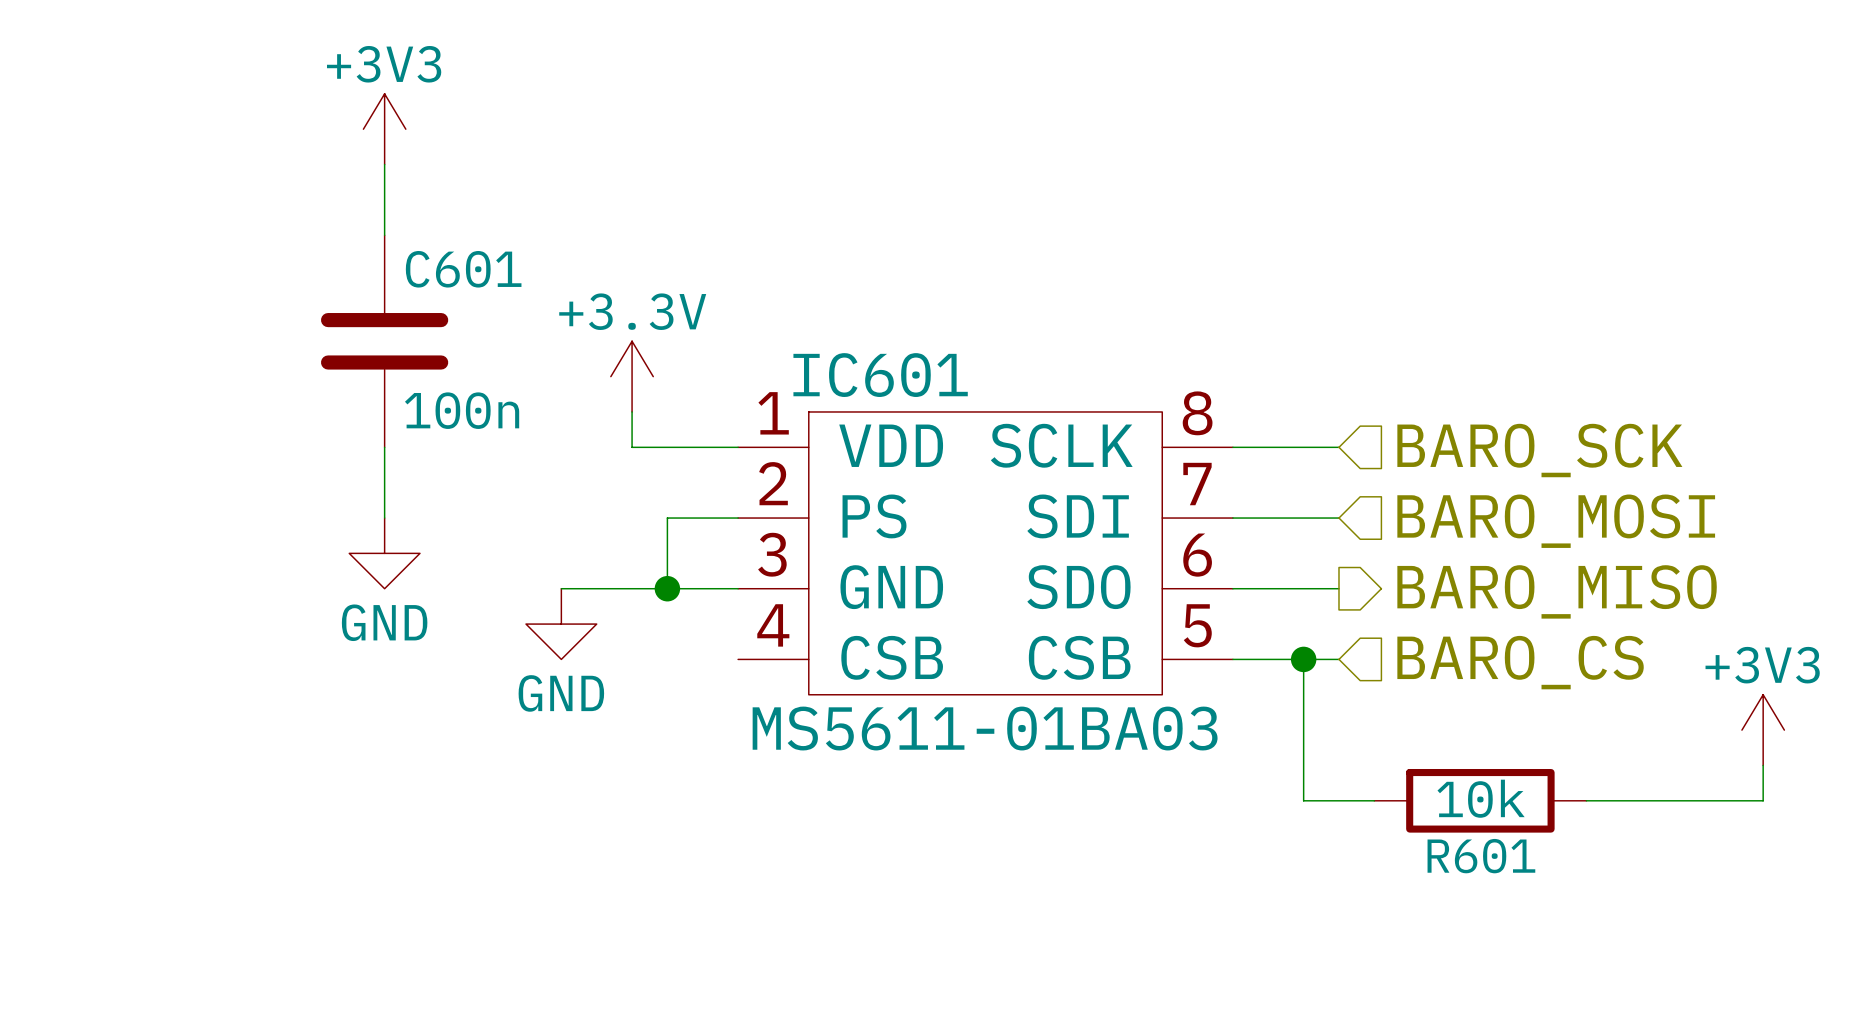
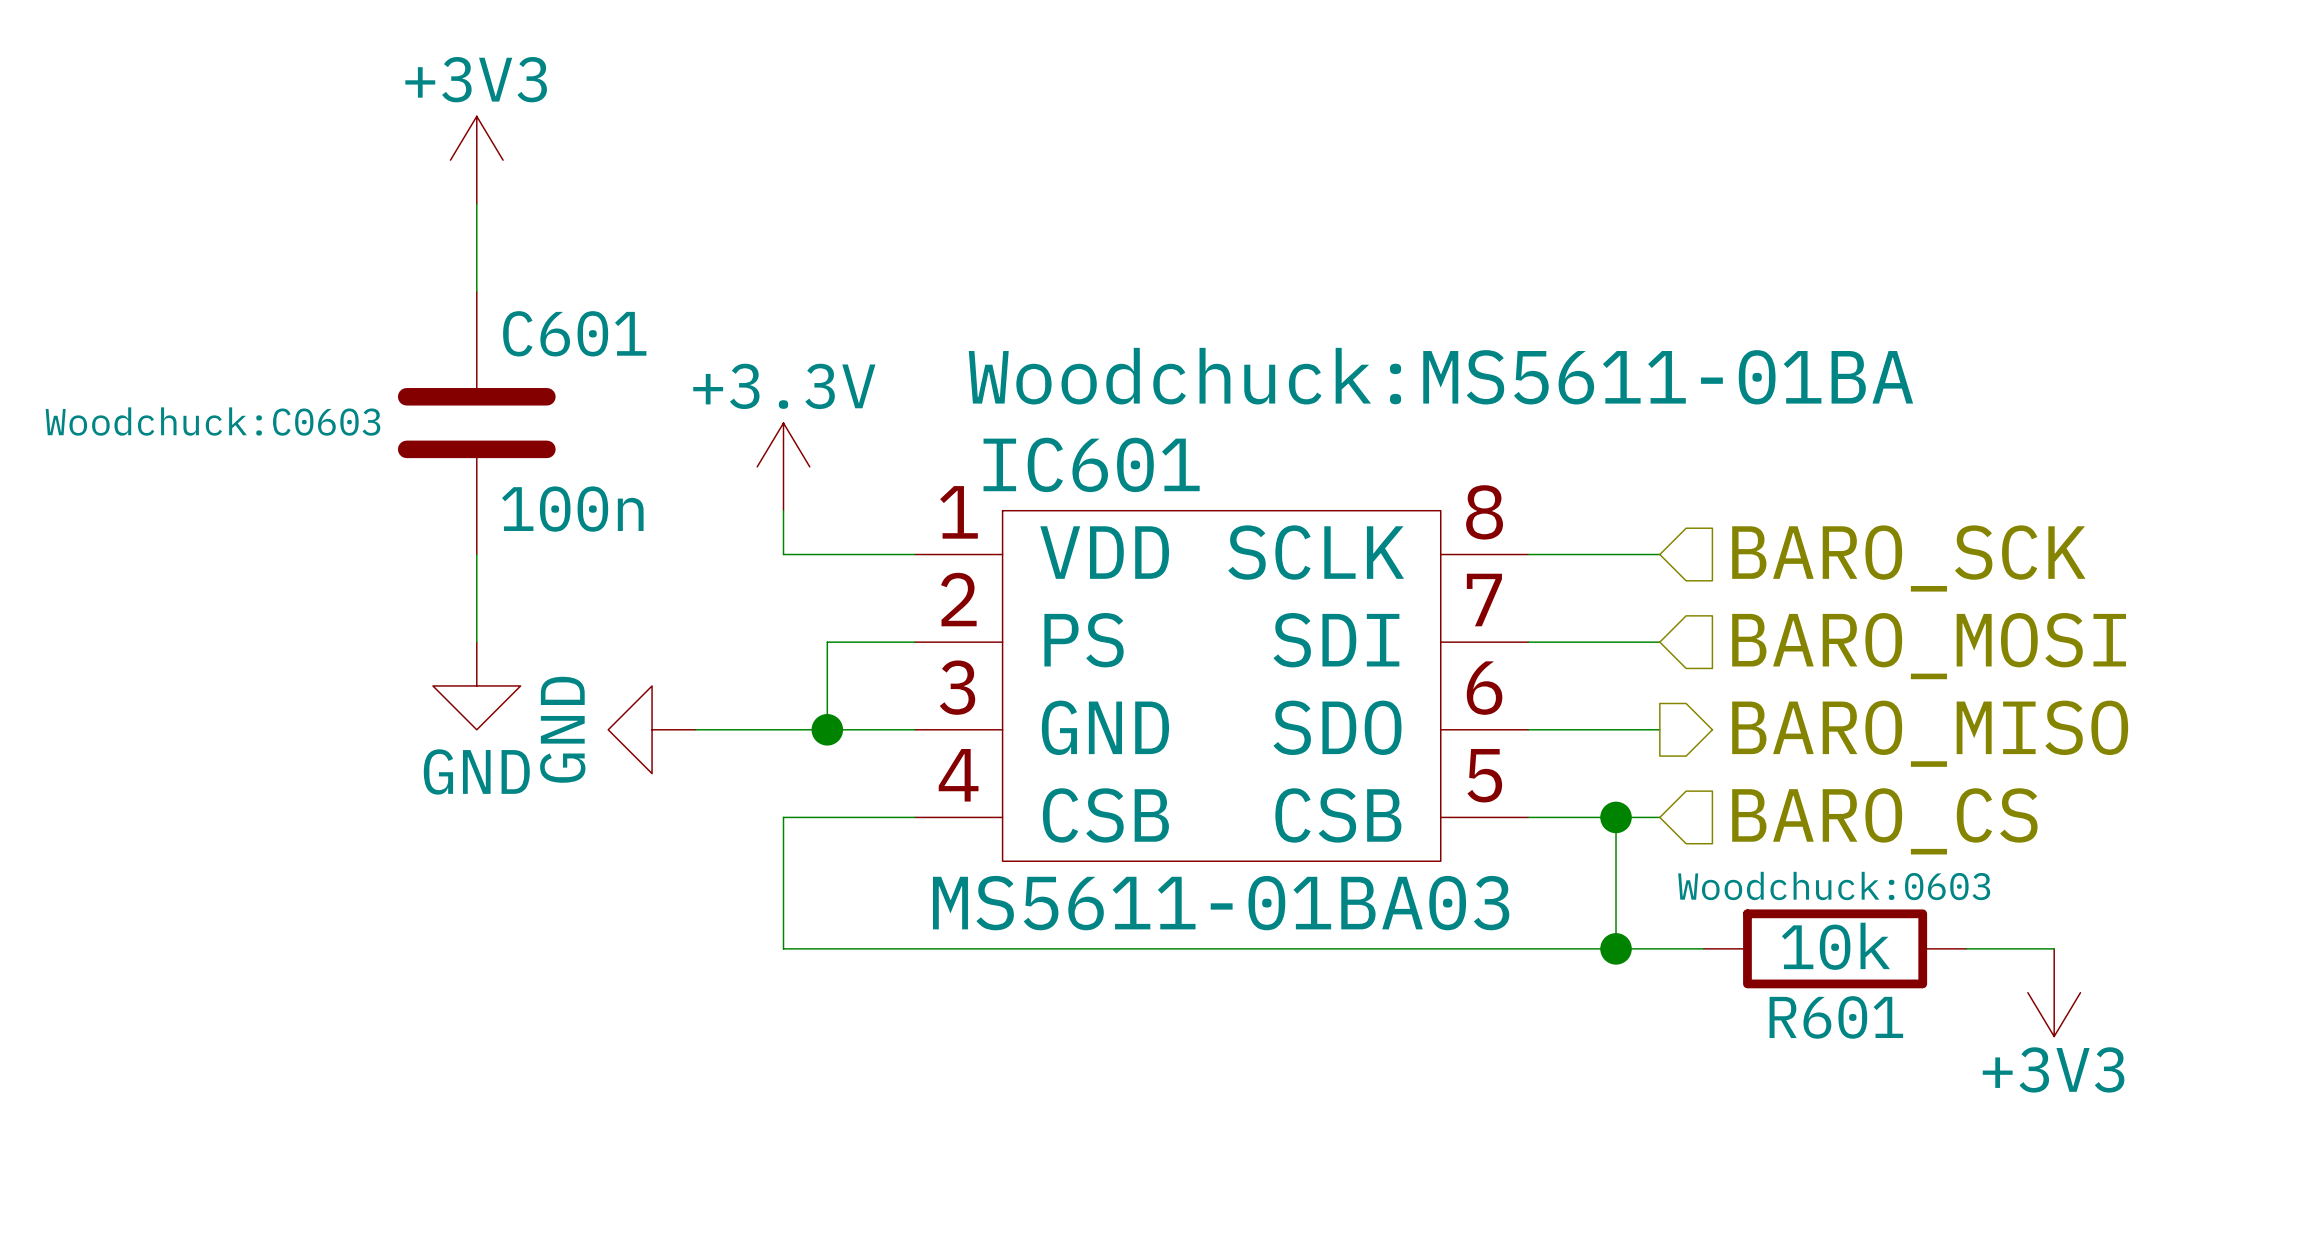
IC601 text: none -> Woodchuck:MS5611-01BA (1440, 376)
C601 text: none -> Woodchuck:C0603 (212, 421)
power symbol rotation: 0° (561, 624) -> 90° clockwise (652, 729)
power symbol position: GND (561, 624) -> GND (652, 729)
wire: none -> (914, 817) (783, 817) (783, 948) (1703, 948)
R601 text: none -> Woodchuck:0603 (1834, 885)
power symbol rotation: 0° (1763, 730) -> 180° (2054, 992)
power symbol position: +3V3 (1763, 730) -> +3V3 (2054, 992)
wire: (1303, 765) (1303, 800) (1374, 800) -> none
junction: none -> (1616, 948)
wire: none -> (1966, 948) (2054, 948)
wire: (1763, 765) (1763, 800) (1586, 800) -> none
R601 position: (1480, 800) -> (1835, 948)

